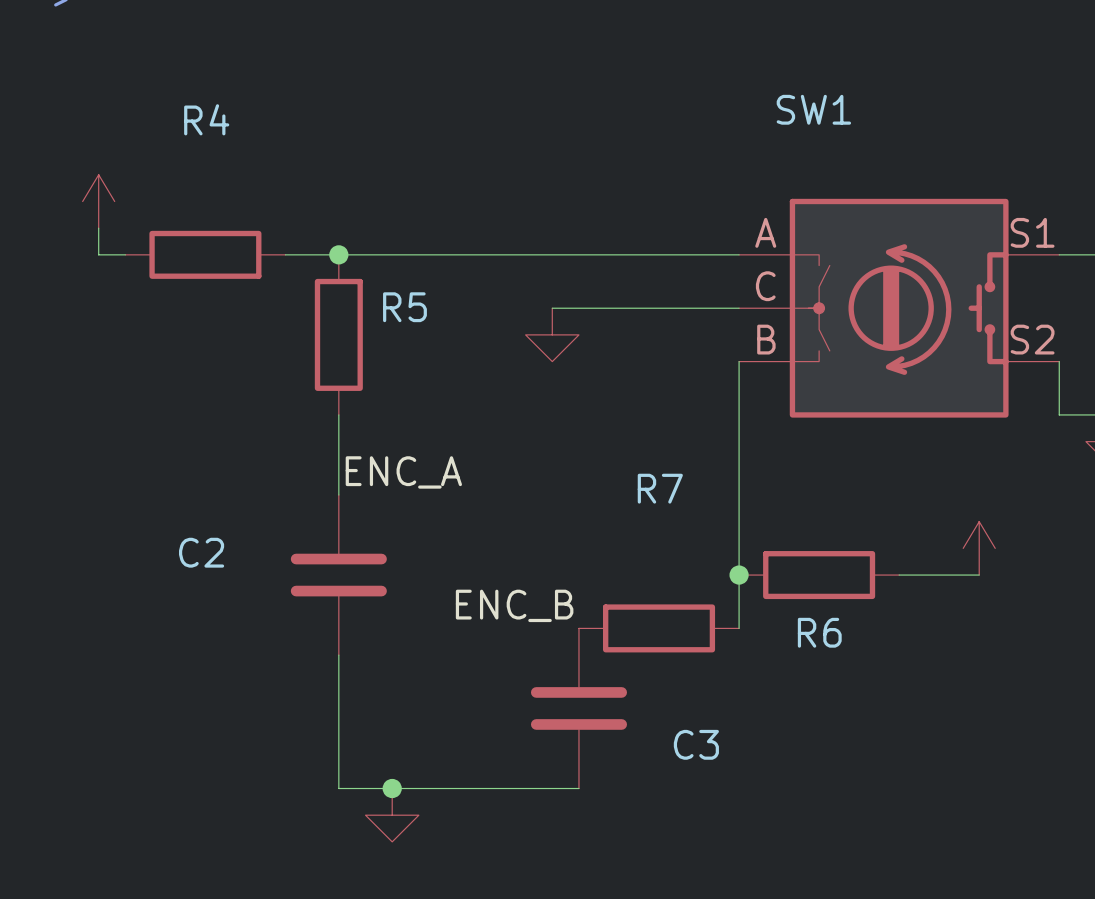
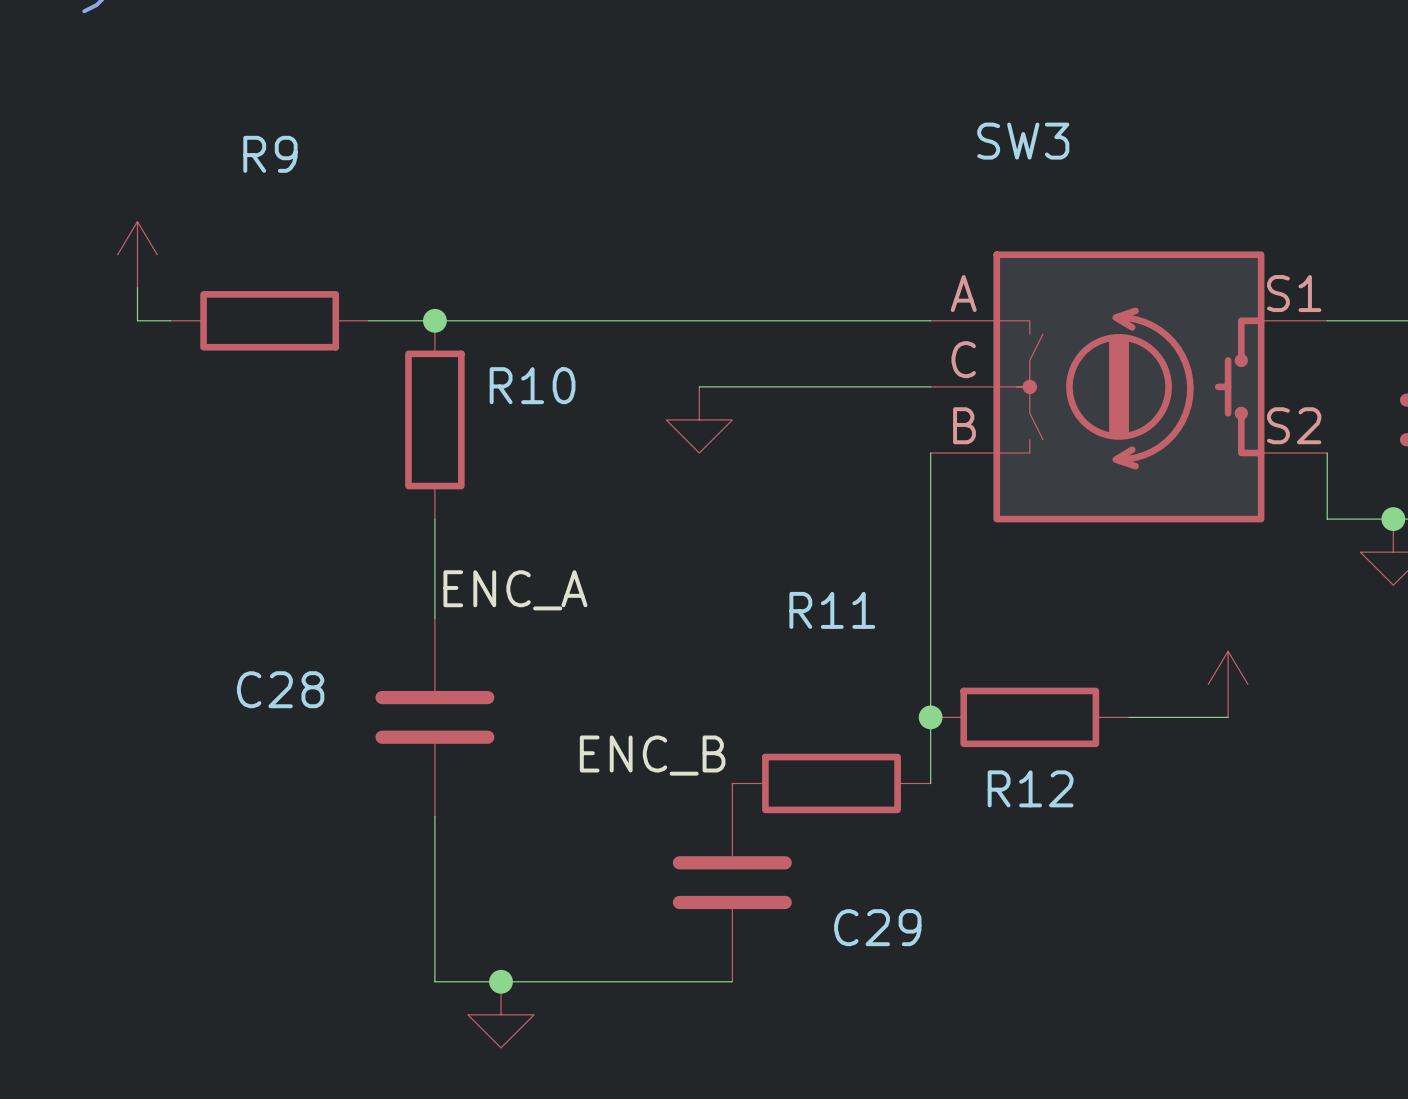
SW1 name: SW1 (813, 109) -> SW3 (1023, 141)
R4 name: R4 (206, 119) -> R9 (270, 154)
R5 name: R5 (404, 307) -> R10 (532, 385)
R7 name: R7 (660, 488) -> R11 (832, 610)
C2 name: C2 (201, 552) -> C28 (280, 689)
R6 name: R6 (819, 632) -> R12 (1030, 788)
C3 name: C3 (696, 744) -> C29 (877, 927)

